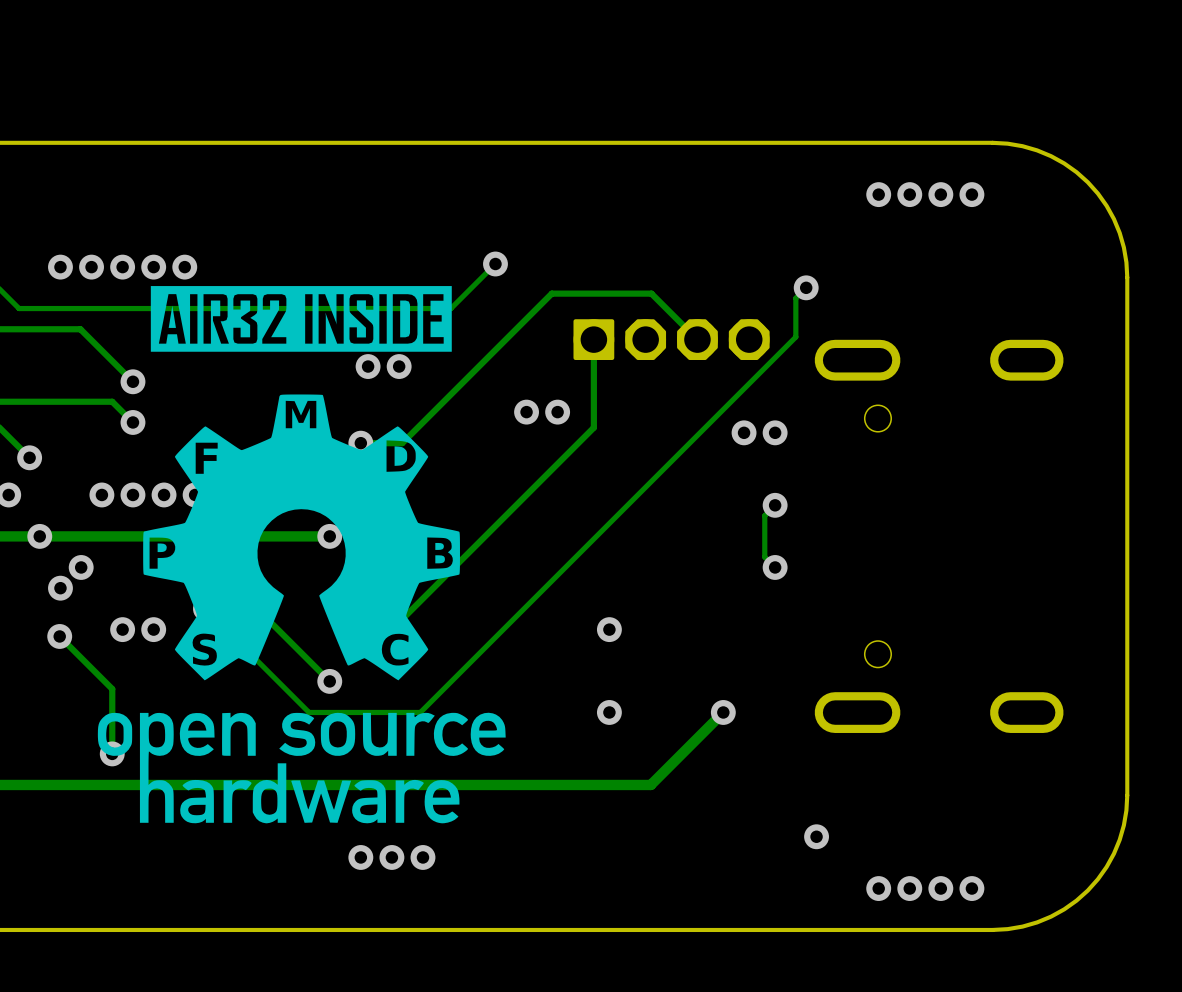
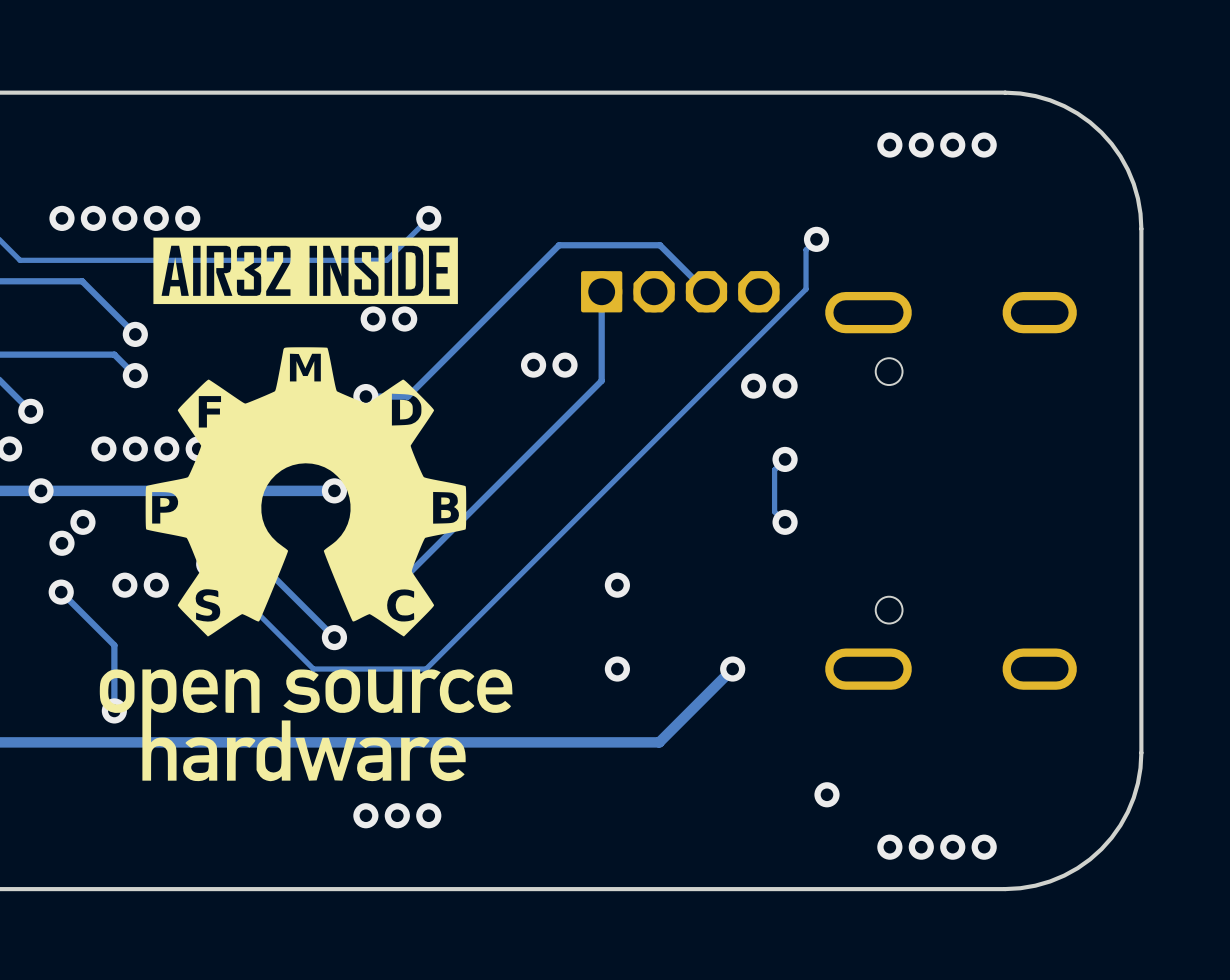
track: (495, 264) (450, 308) (381, 308) -> (428, 218) (386, 260)
via position: (495, 264) -> (428, 218)

